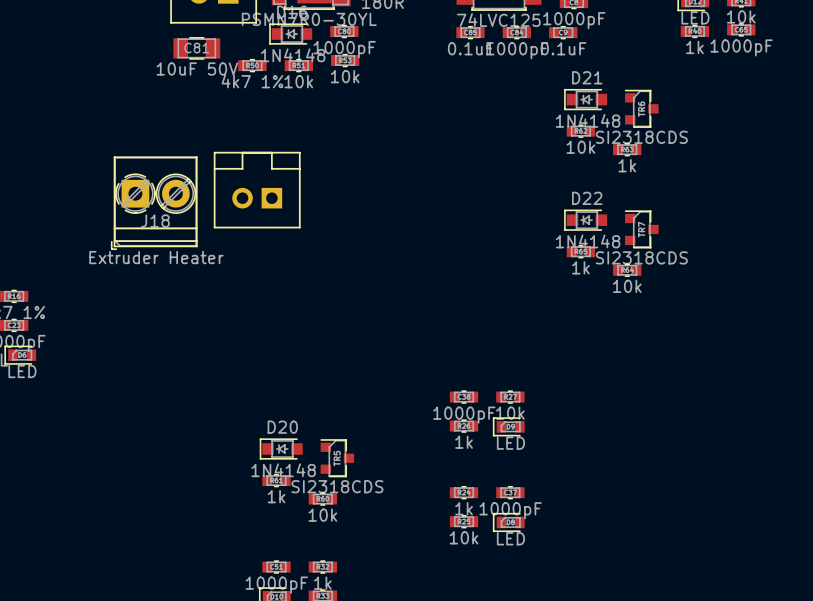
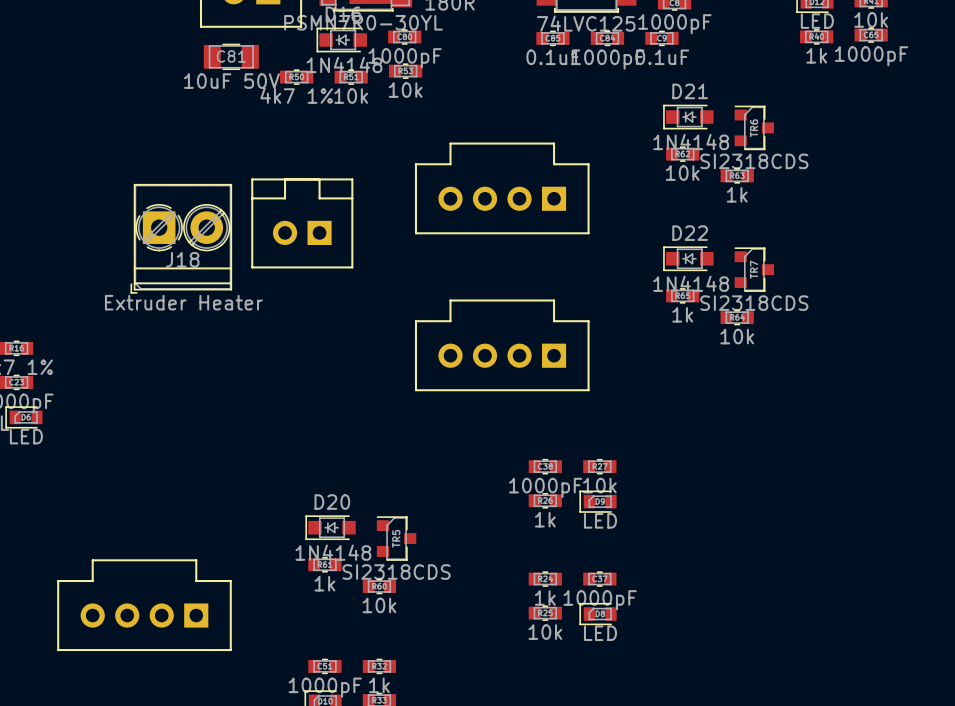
part: none -> (502, 188)
part: none -> (502, 345)
part: none -> (144, 605)

